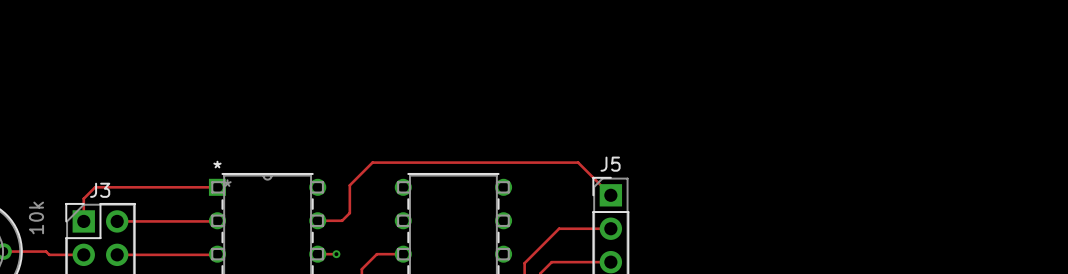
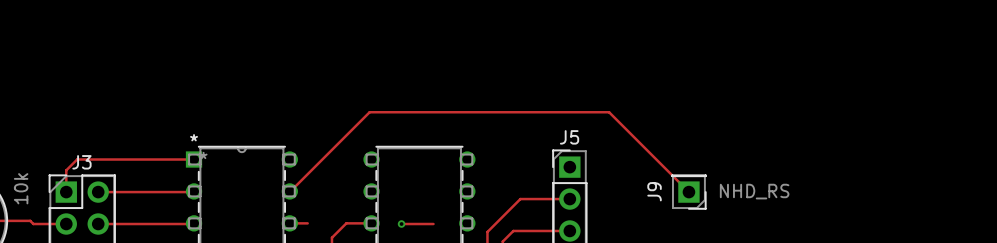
track: (610, 195) (578, 162) (372, 162) (349, 185) (349, 213) (342, 220) (317, 220) -> none
track: none -> (289, 192) (369, 112) (609, 112) (688, 192)
J9: none -> NHD_RS (688, 192)
via: (336, 254) -> none
track: none -> (401, 224) (433, 224)
via: none -> (401, 224)

